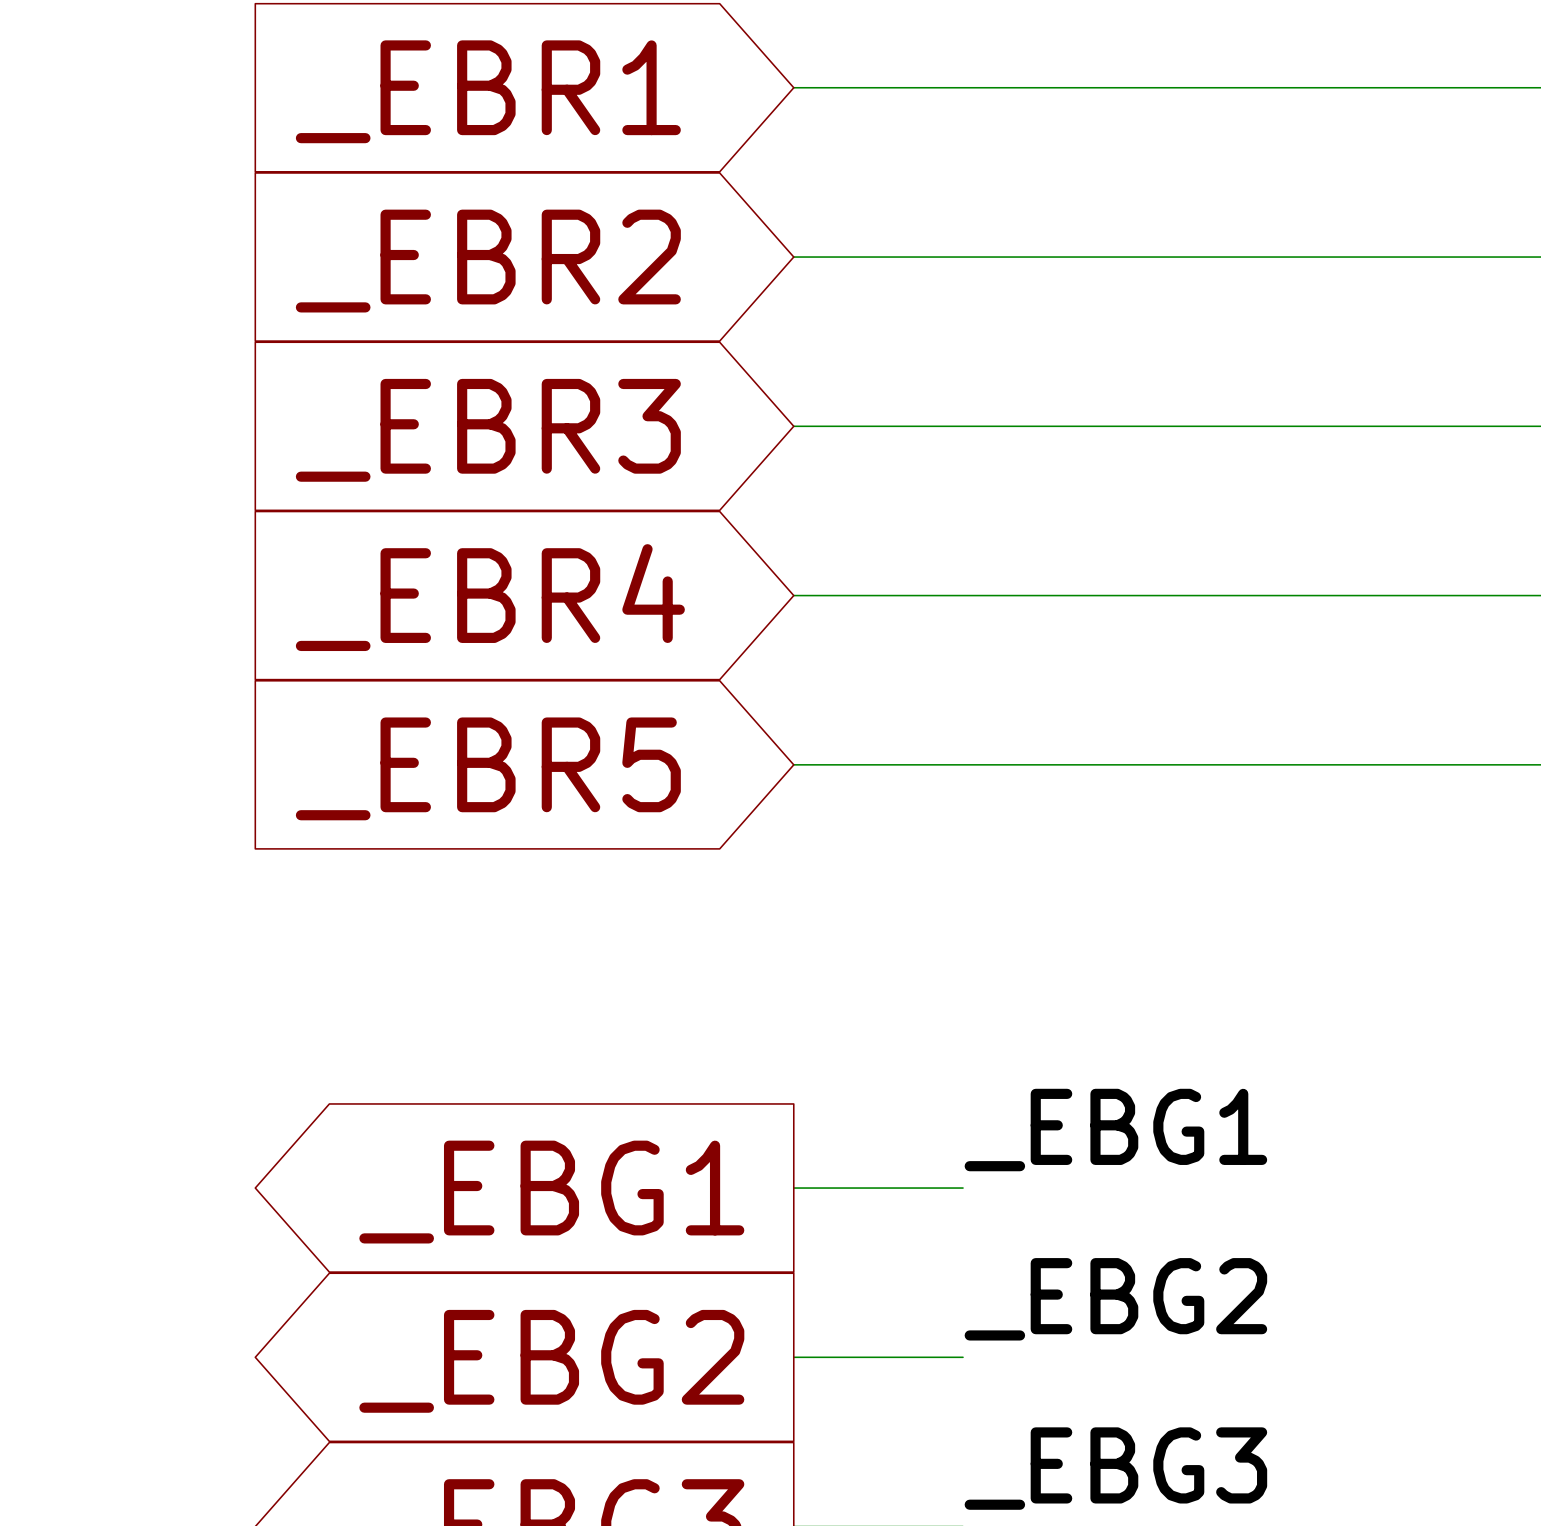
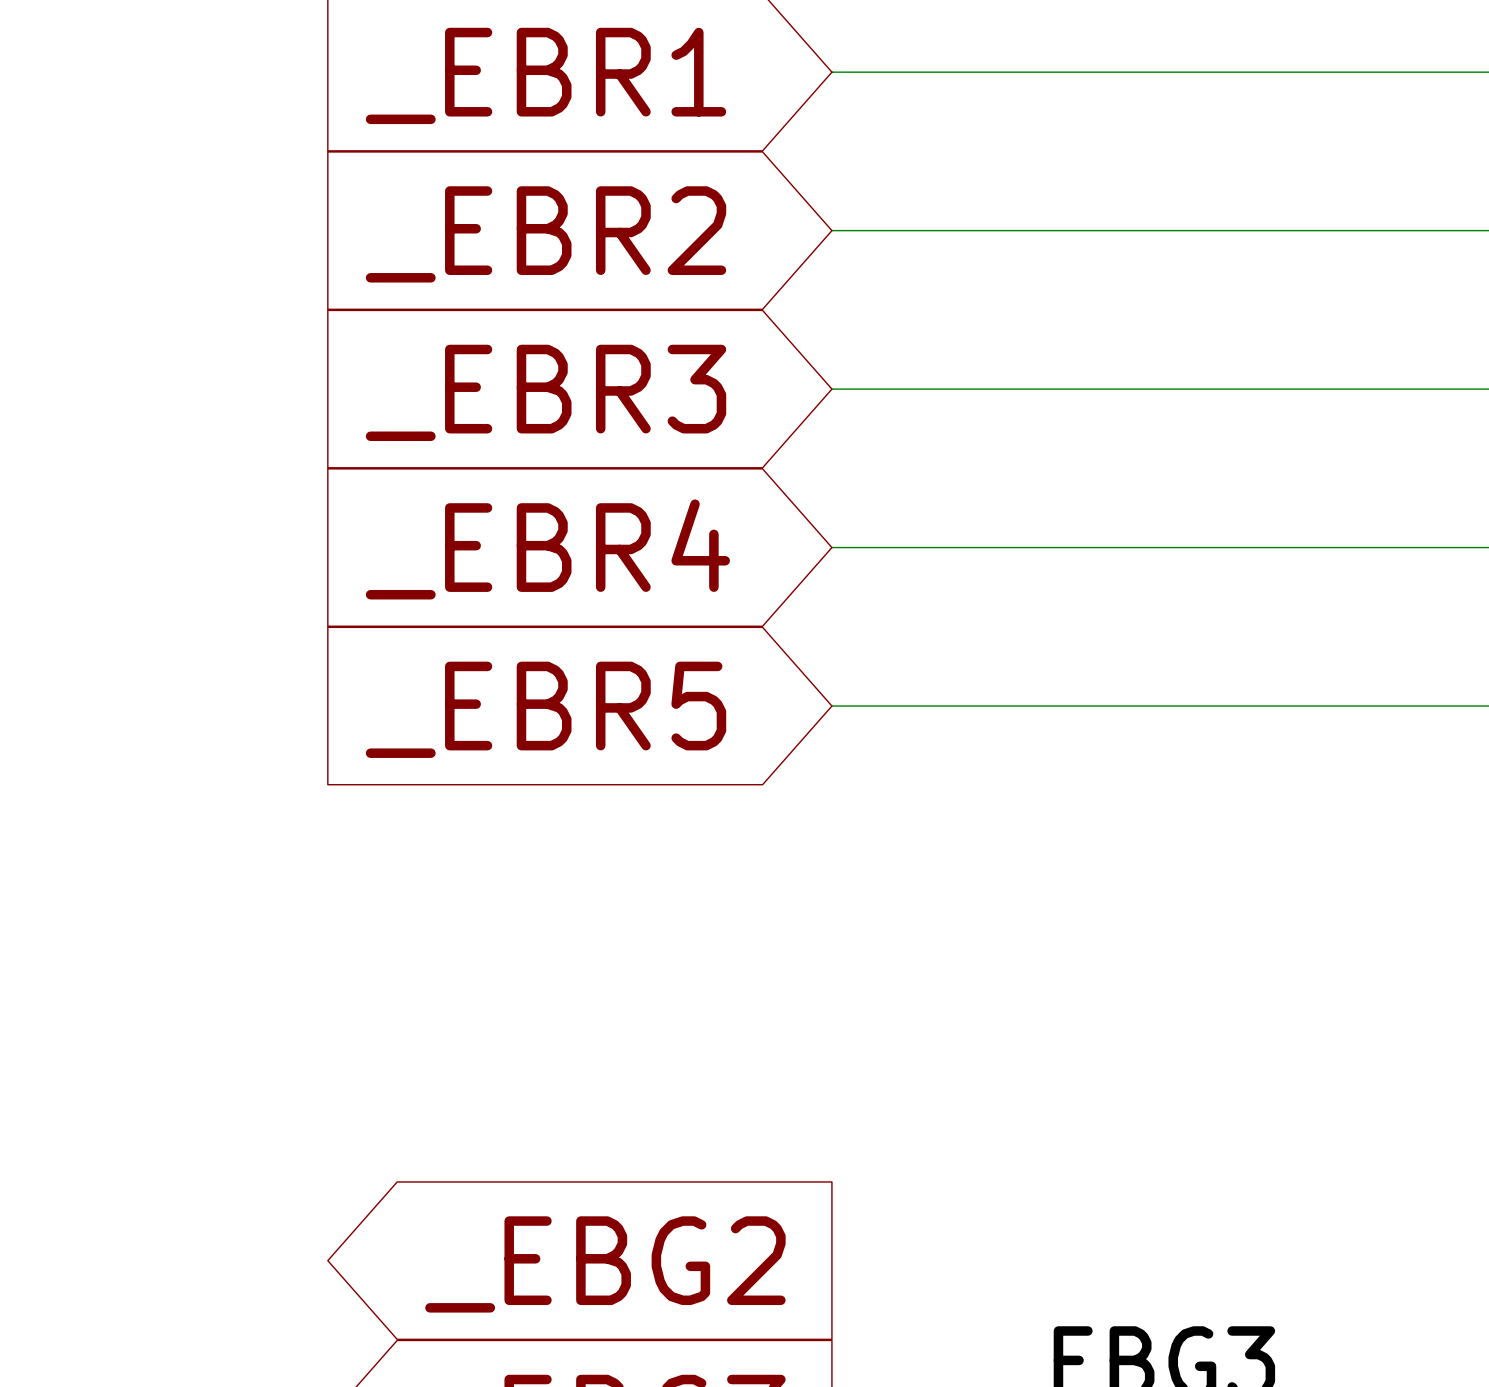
label: _EBG1 (1115, 1130) -> none
wire: (793, 1188) (963, 1188) -> none
global label: _EBG1 (551, 1192) -> none
label: _EBG2 (1115, 1299) -> none
wire: (793, 1357) (963, 1357) -> none

